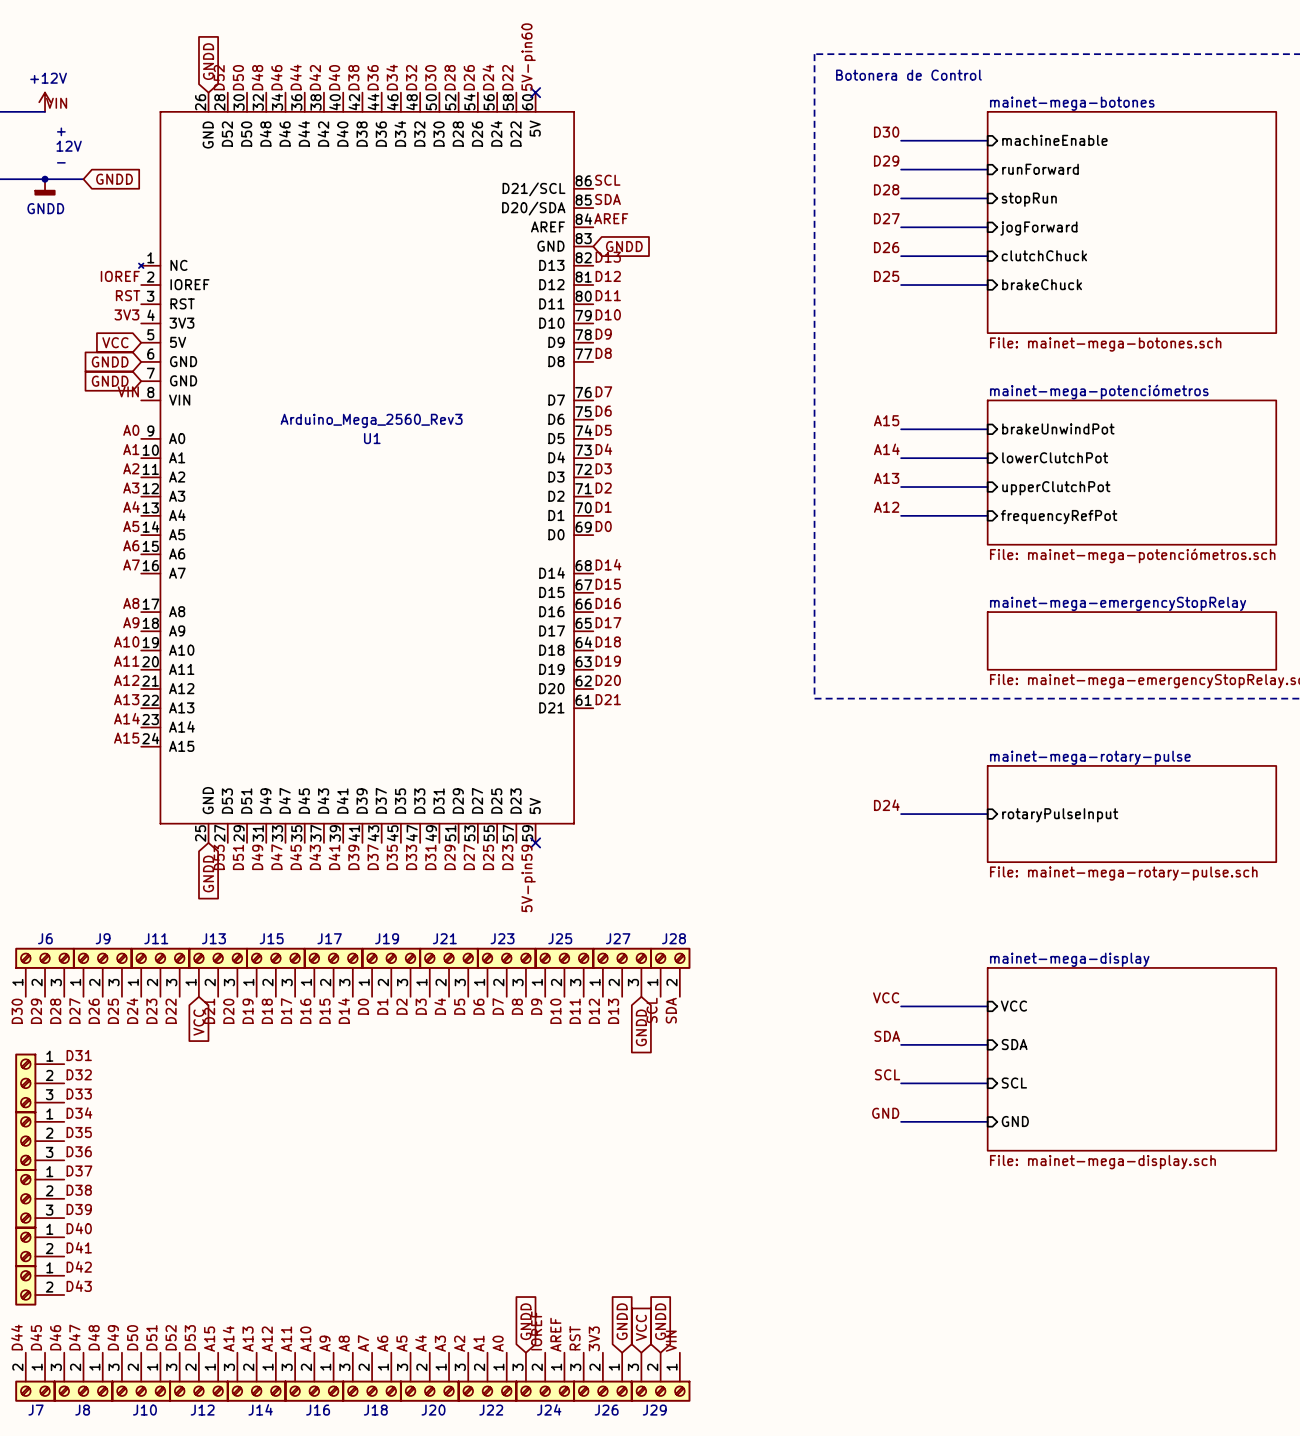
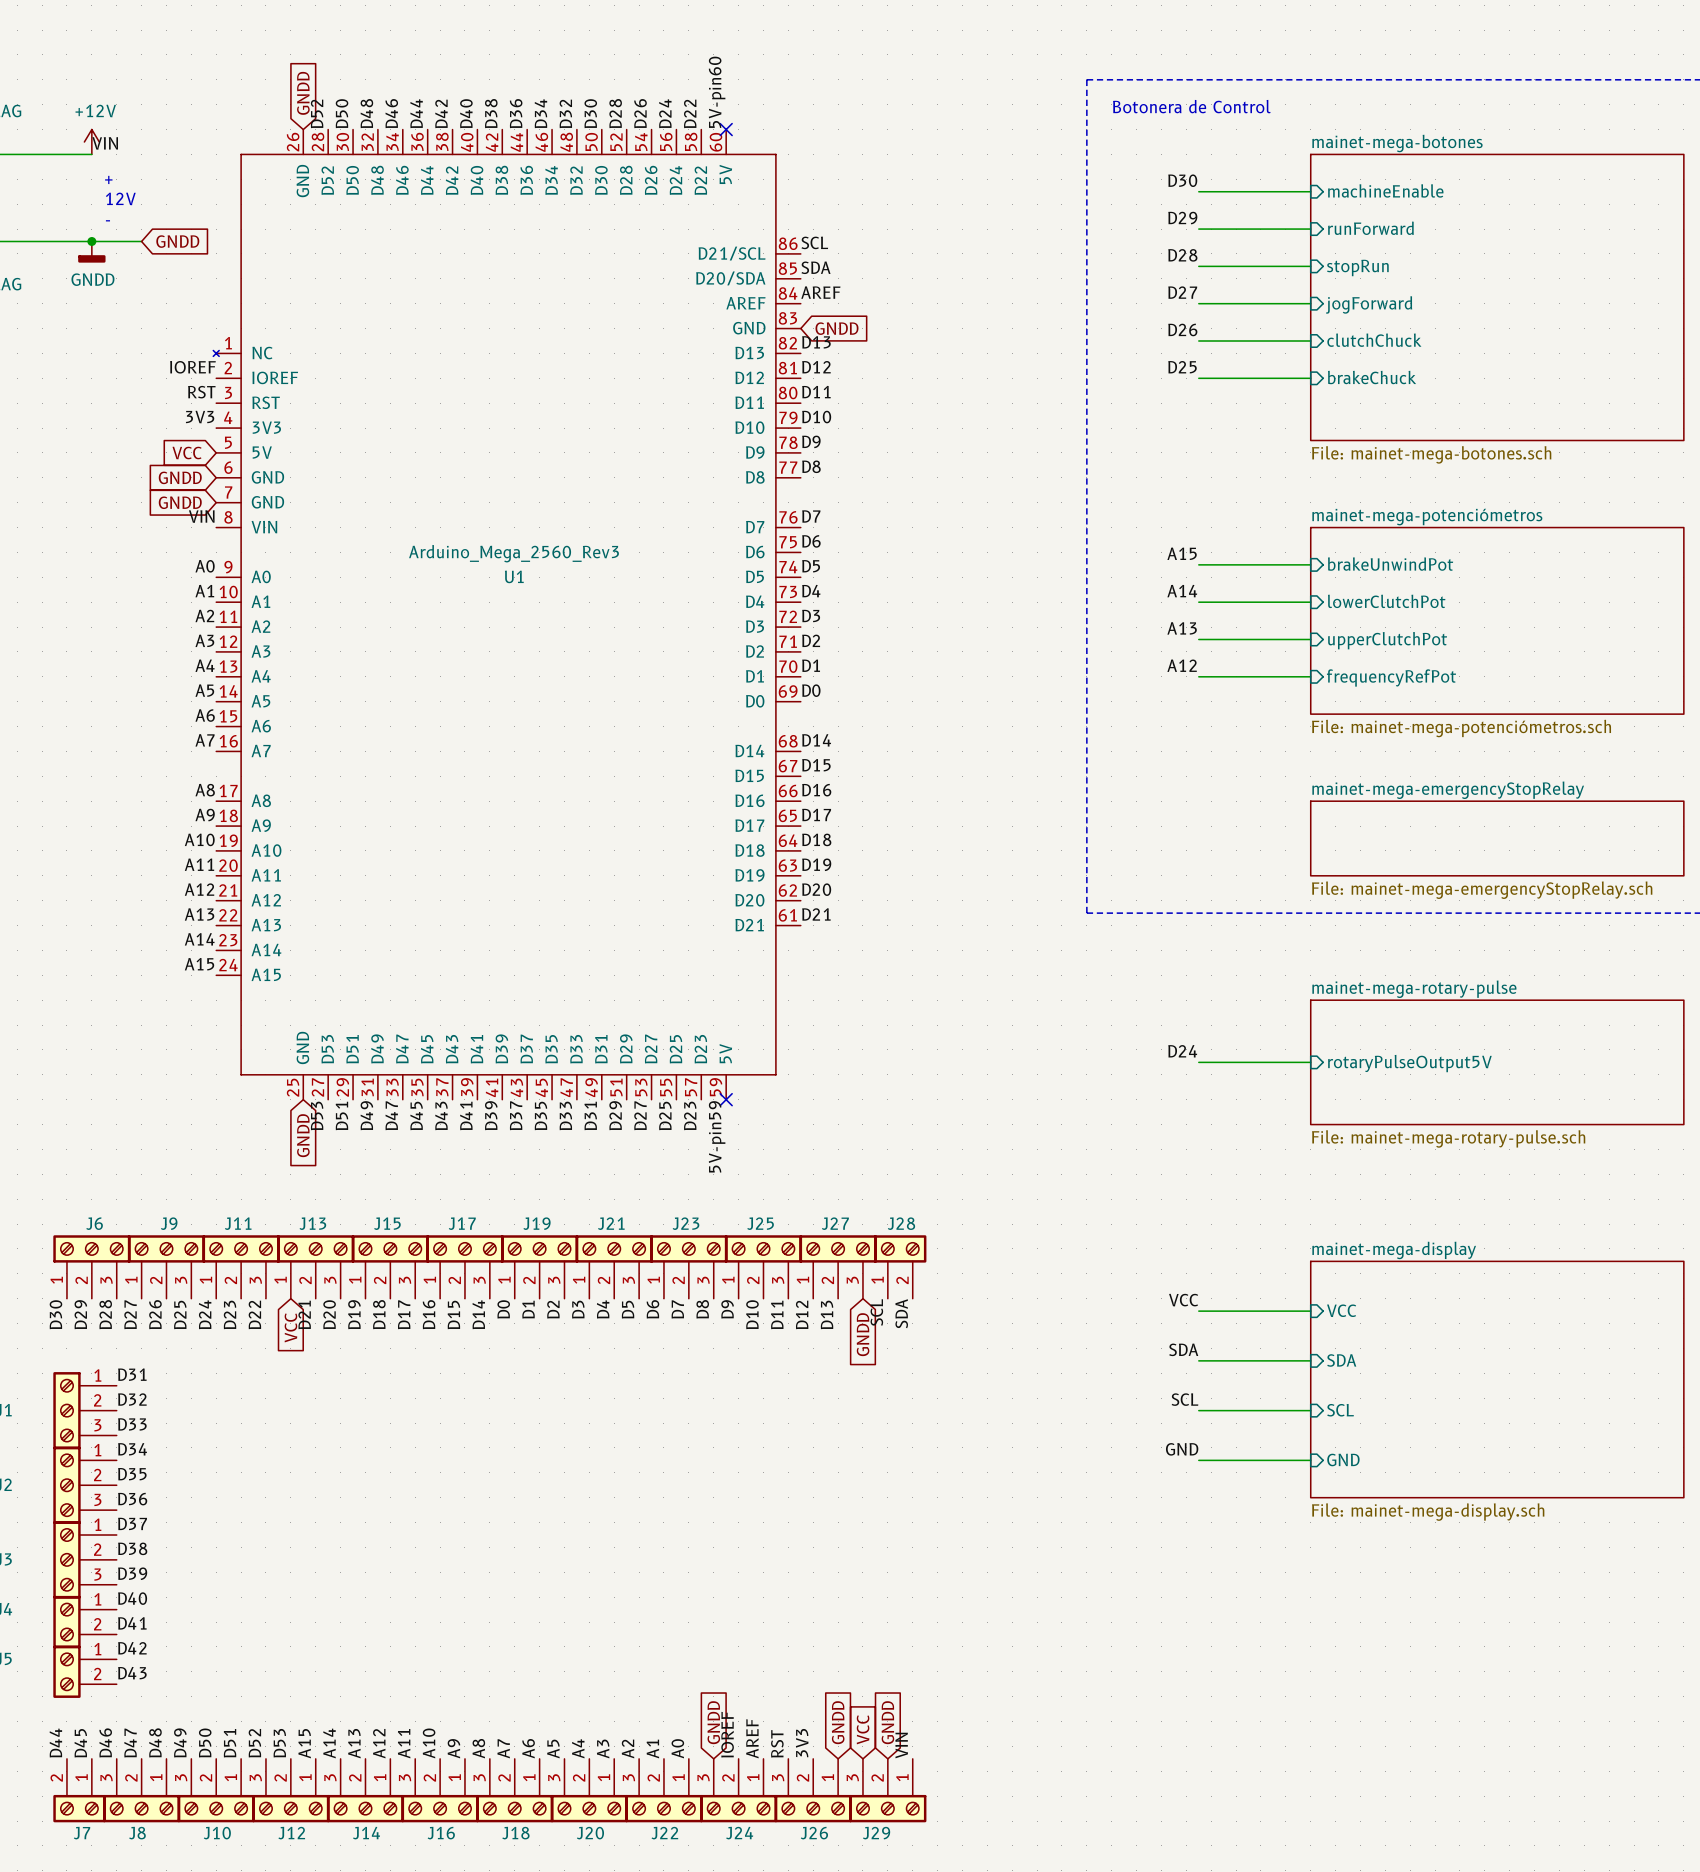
sheet pin: rotaryPulseInput (1060, 815) -> rotaryPulseOutput5V (1409, 1063)

